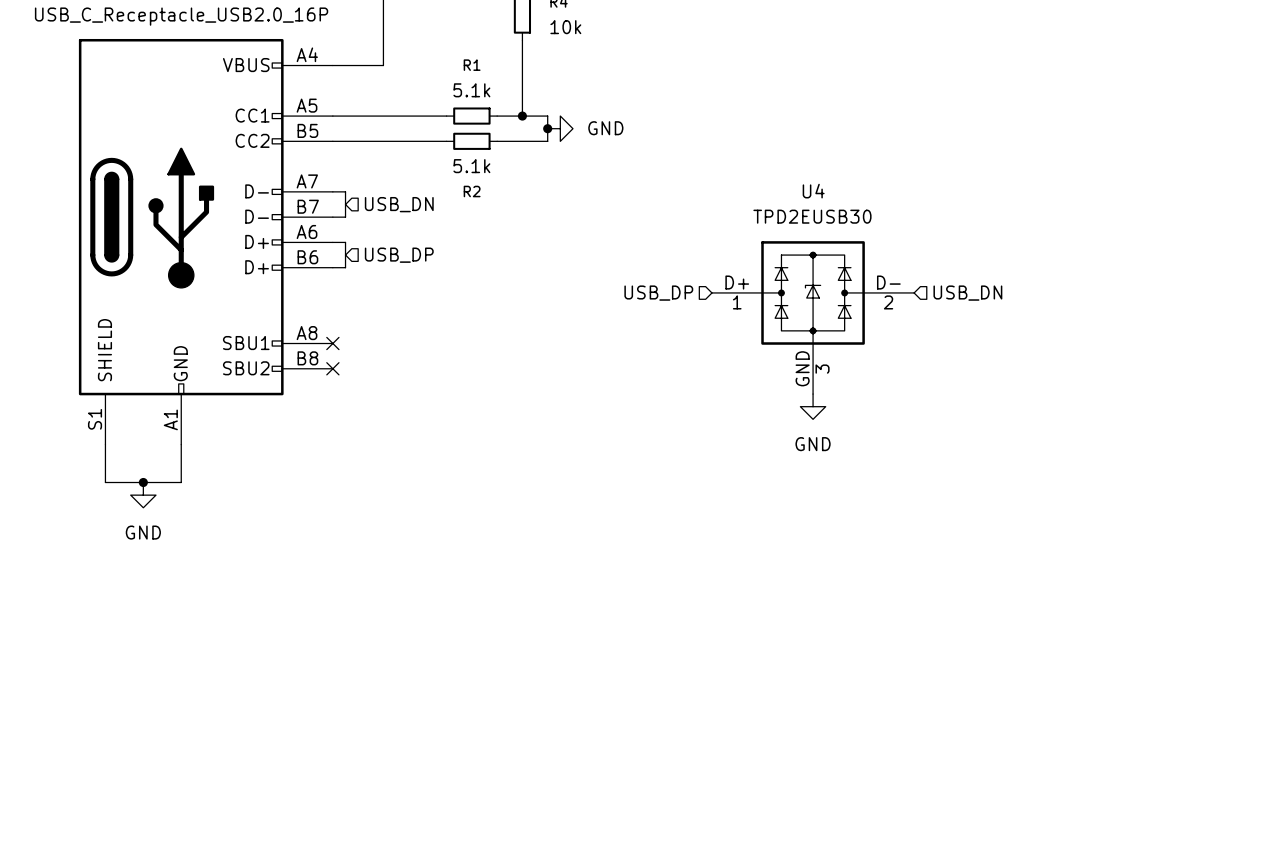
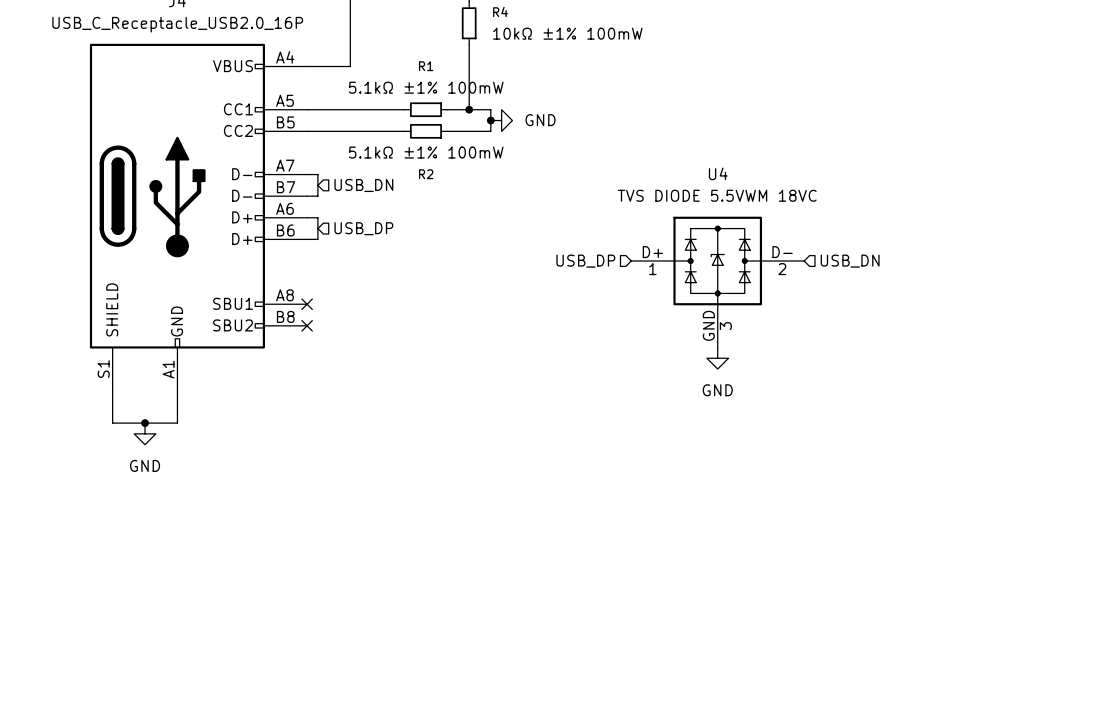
R4 value: 10k (565, 27) -> 10kΩ ±1% 100mW (567, 33)
R1 value: 5.1k (471, 90) -> 5.1kΩ ±1% 100mW (426, 87)
R2 value: 5.1k (471, 166) -> 5.1kΩ ±1% 100mW (426, 152)
U4 value: TPD2EUSB30 (812, 216) -> TVS DIODE 5.5VWM 18VC (717, 195)

